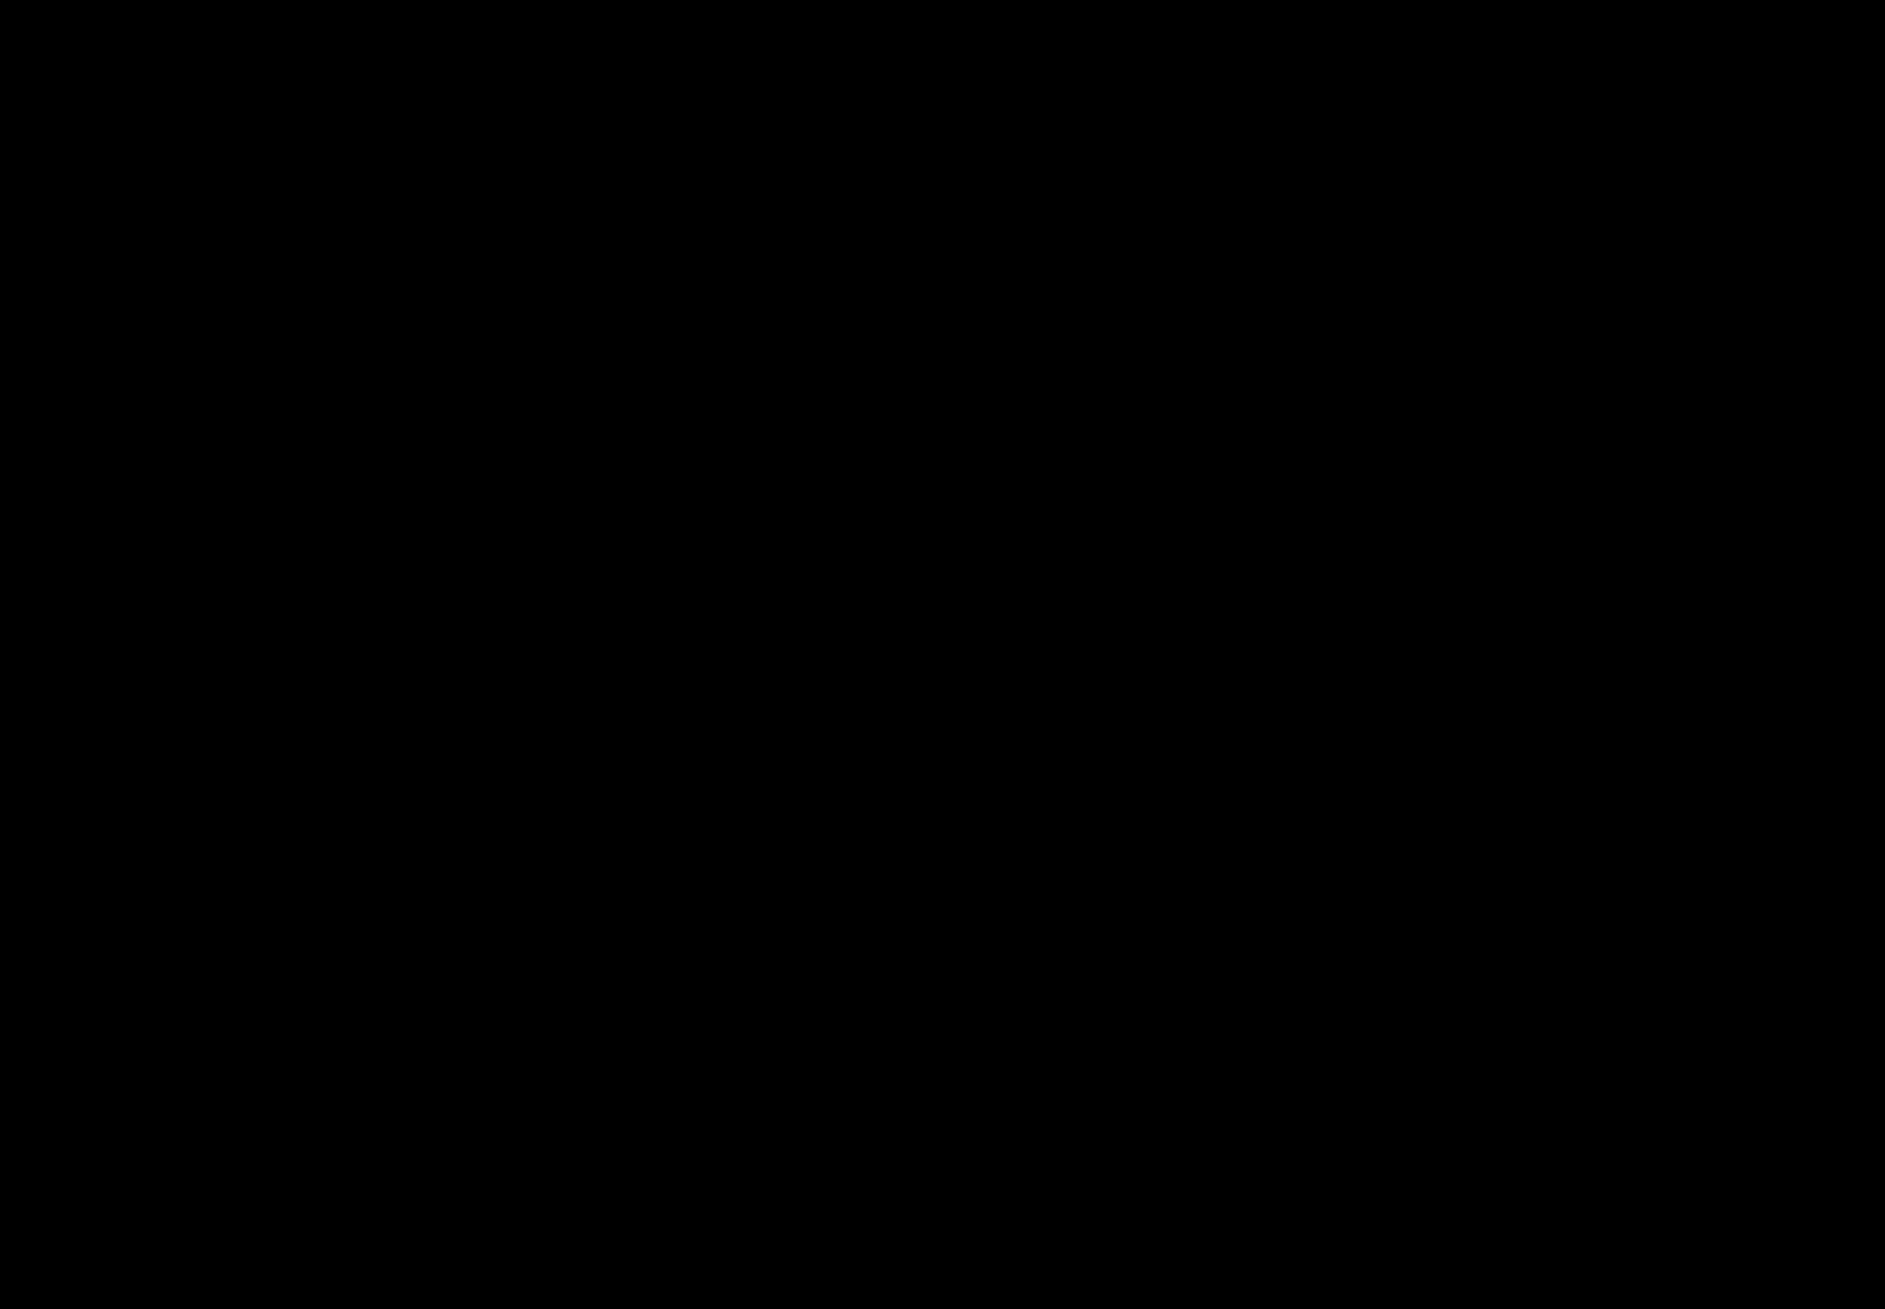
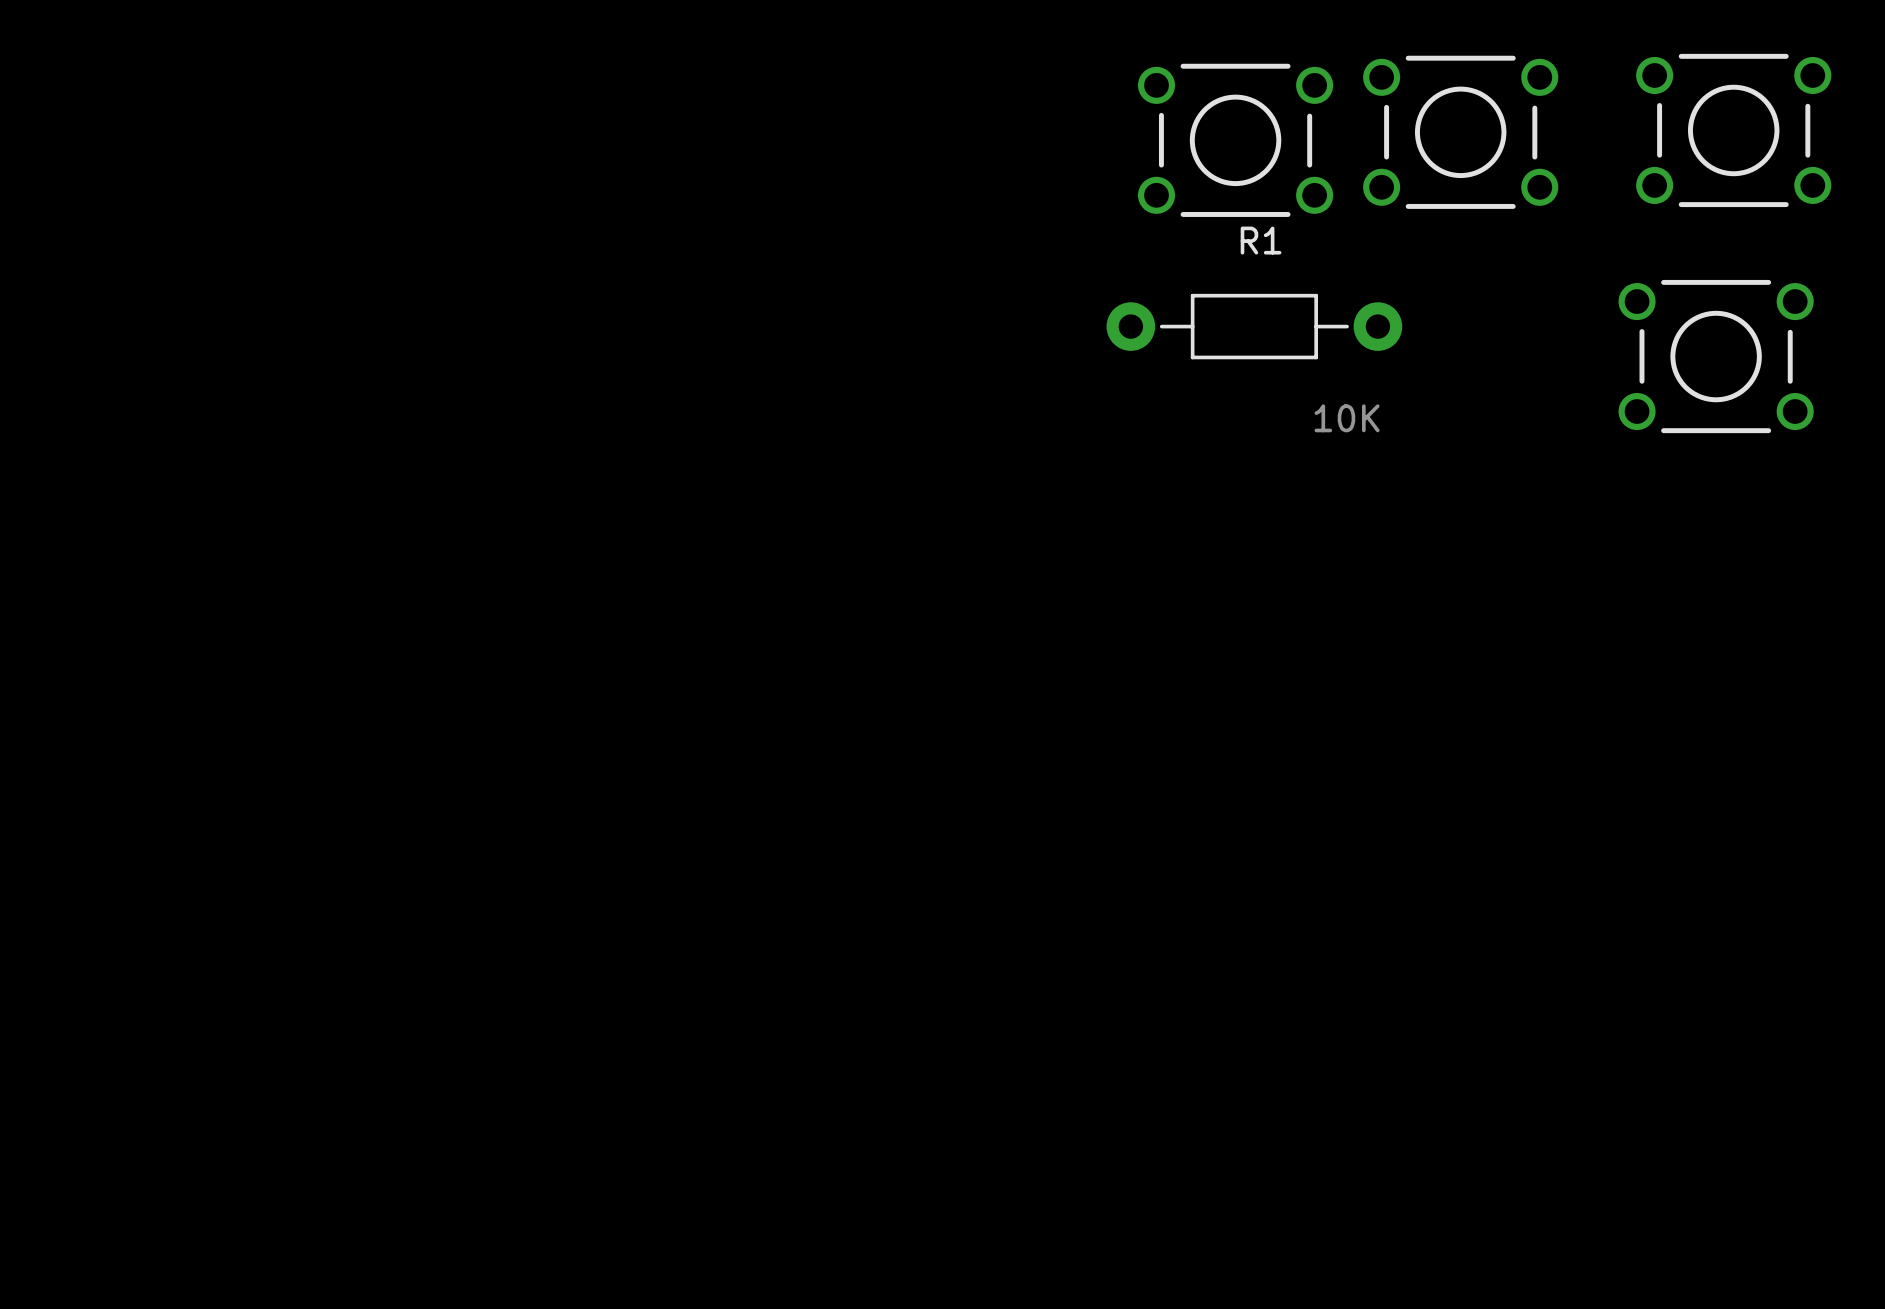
part: none -> (1733, 130)
part: none -> (1460, 132)
part: none -> (1235, 140)
R1: none -> 10K (1254, 326)
part: none -> (1716, 356)

